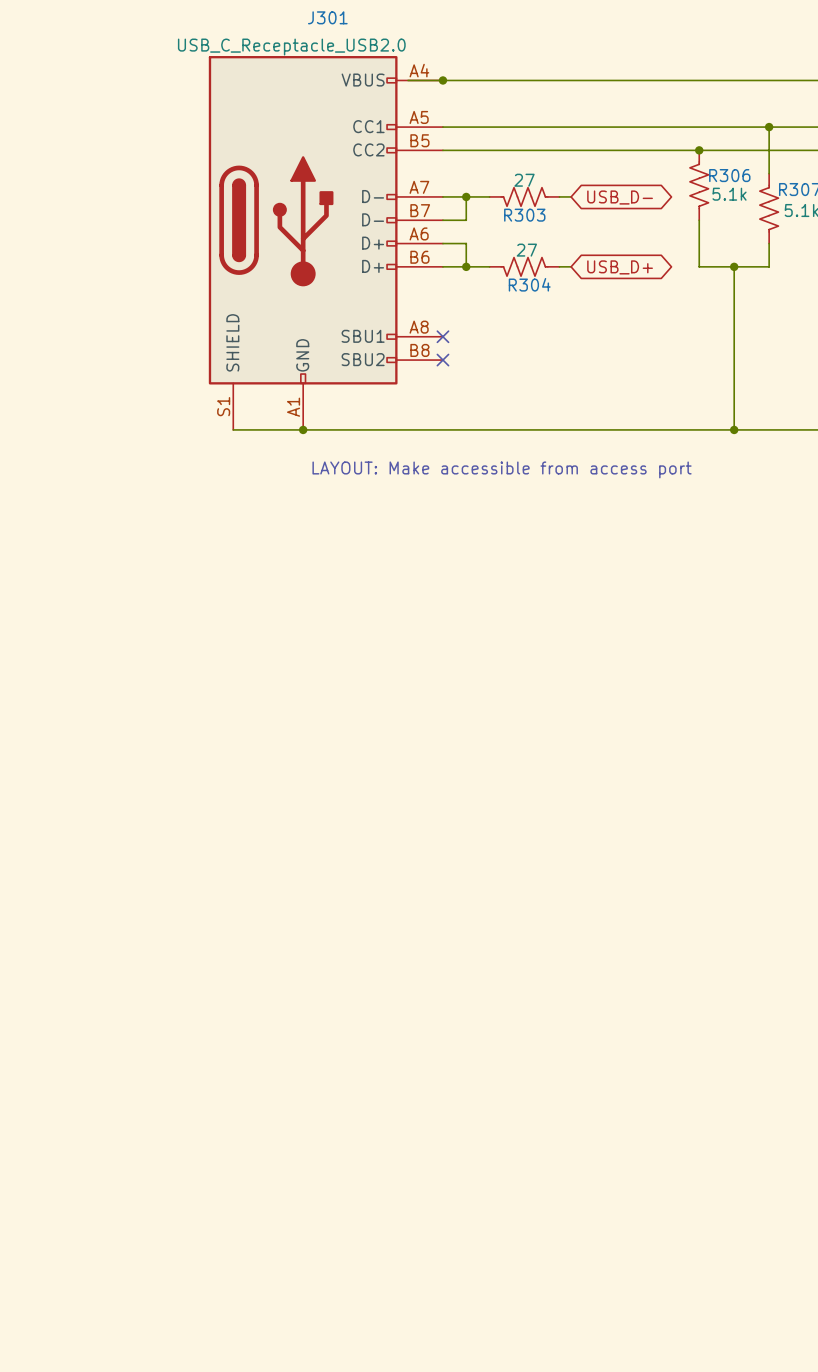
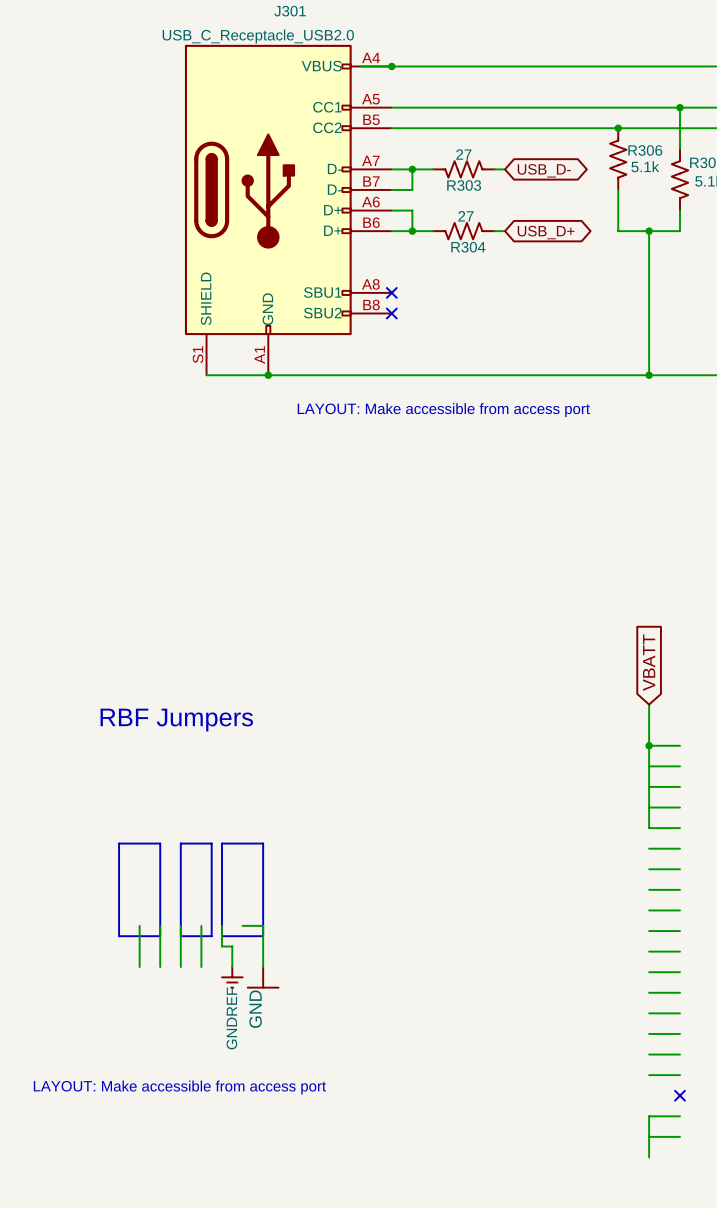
global label: none -> VBATT (649, 662)
wire: none -> (649, 704) (649, 828) (679, 828)
text: none -> RBF Jumpers (176, 720)
wire: none -> (649, 745) (679, 745)
junction: none -> (649, 745)
wire: none -> (649, 766) (679, 766)
wire: none -> (649, 786) (679, 786)
wire: none -> (649, 807) (679, 807)
line: none -> (119, 843) (160, 843) (160, 936) (119, 936) (119, 843)
line: none -> (180, 843) (211, 843) (211, 936) (180, 936) (180, 843)
line: none -> (221, 843) (263, 843) (263, 936) (221, 936) (221, 843)
wire: none -> (649, 848) (679, 848)
wire: none -> (649, 869) (679, 869)
wire: none -> (649, 889) (679, 889)
wire: none -> (649, 910) (679, 910)
wire: none -> (139, 925) (139, 967)
wire: none -> (160, 925) (160, 967)
wire: none -> (180, 925) (180, 967)
wire: none -> (201, 925) (201, 967)
wire: none -> (221, 925) (221, 946) (232, 946) (232, 967)
wire: none -> (242, 925) (263, 925) (263, 967)
wire: none -> (649, 931) (679, 931)
wire: none -> (649, 951) (679, 951)
wire: none -> (649, 972) (679, 972)
power symbol: none -> GNDREF (232, 977)
power symbol: none -> GND (263, 977)
wire: none -> (649, 992) (679, 992)
wire: none -> (649, 1013) (679, 1013)
wire: none -> (649, 1033) (679, 1033)
wire: none -> (649, 1054) (679, 1054)
wire: none -> (649, 1075) (679, 1075)
text: none -> LAYOUT: Make accessible from access port (179, 1087)
no-connect mark: none -> (679, 1095)
wire: none -> (679, 1116) (649, 1116) (649, 1157)
wire: none -> (649, 1136) (679, 1136)

